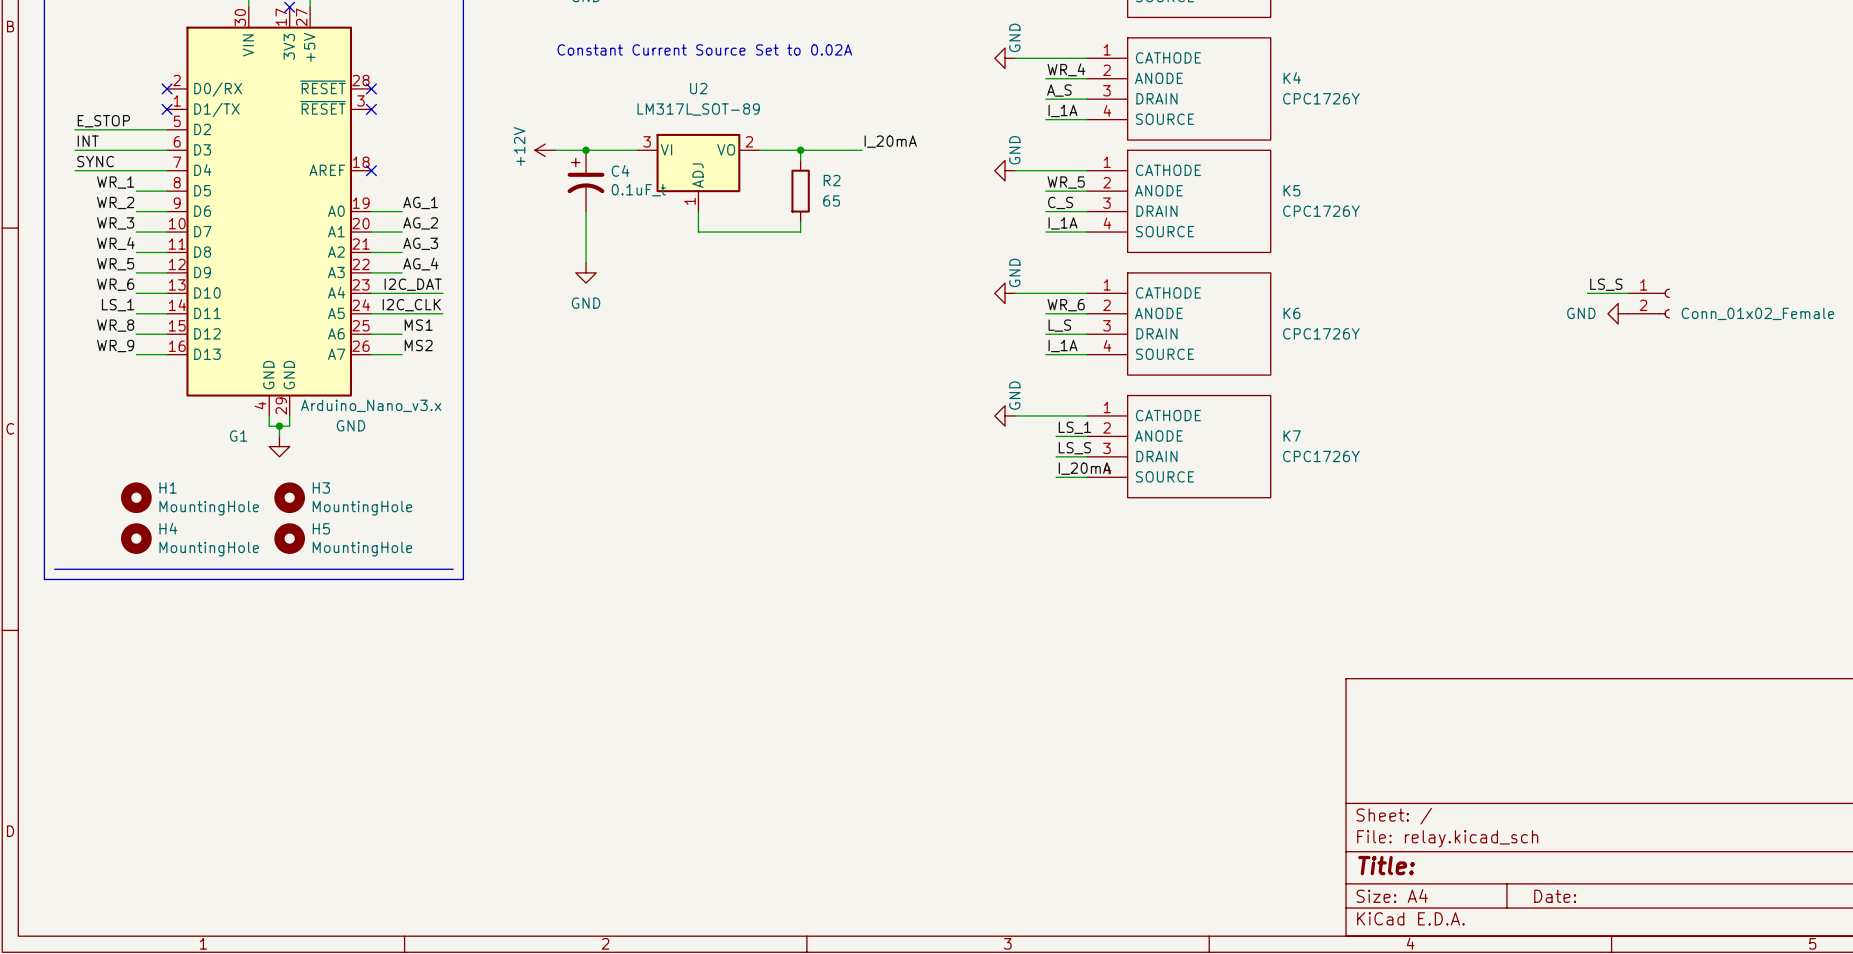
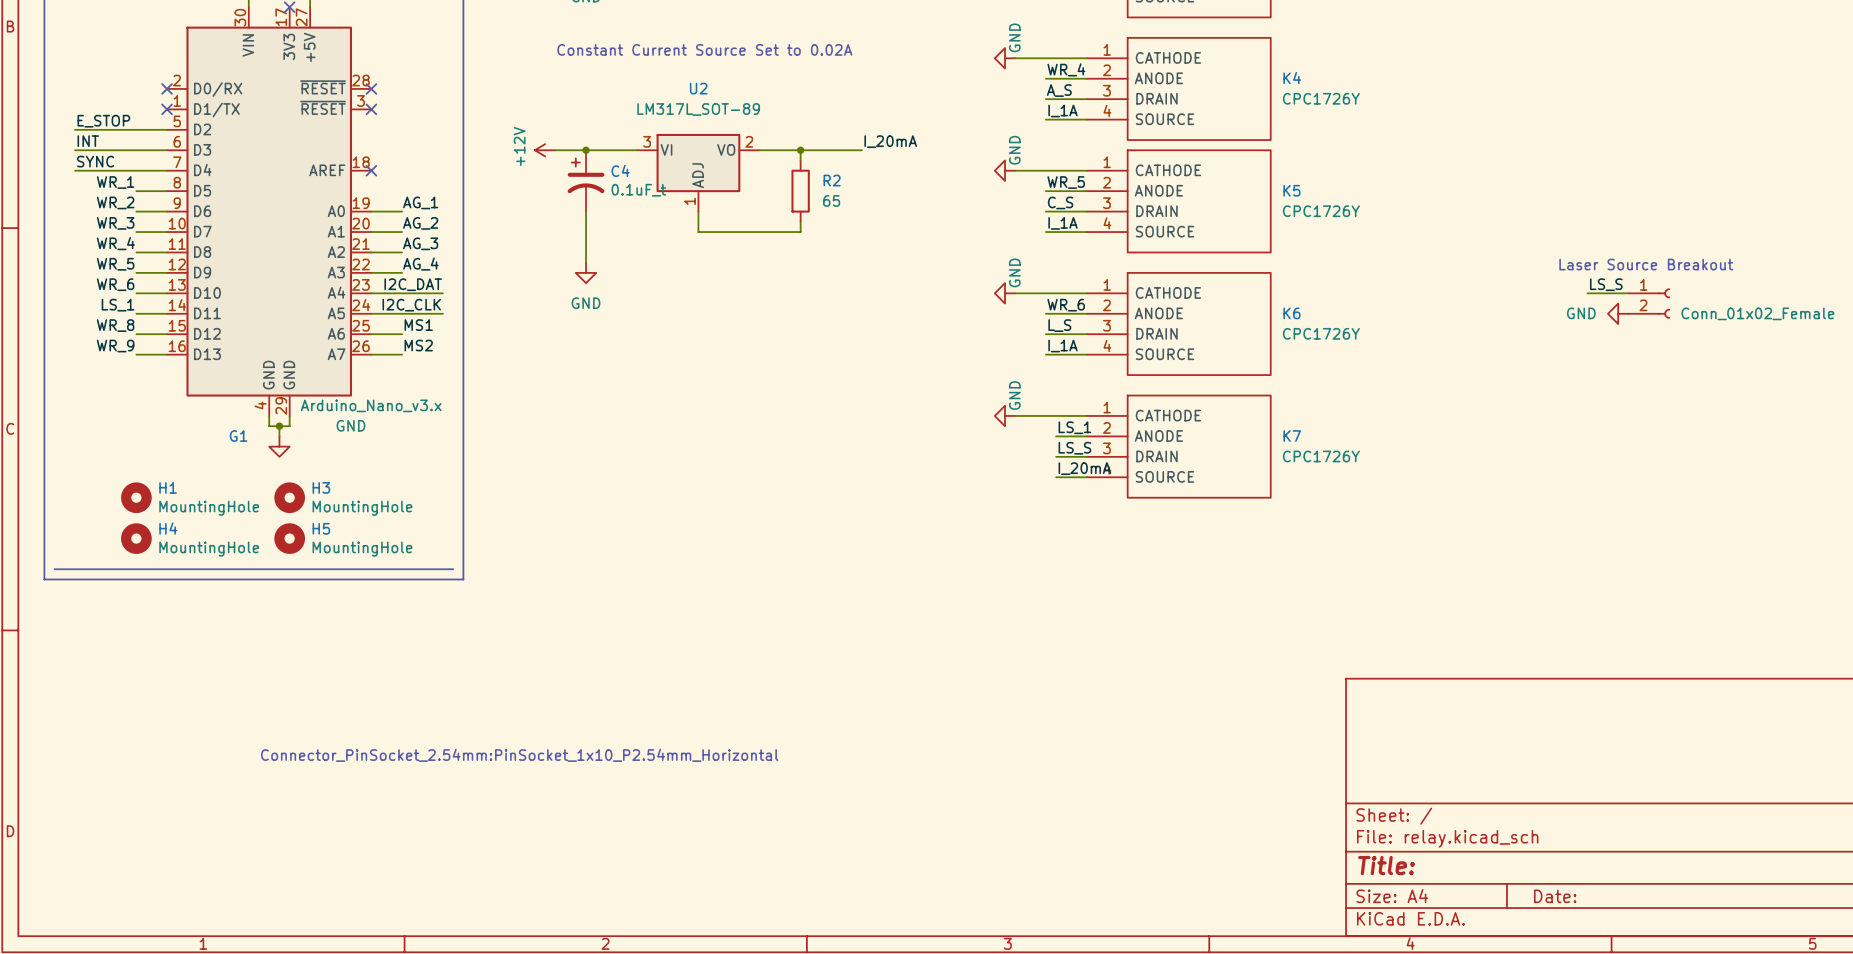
text: none -> Laser Source Breakout (1646, 264)
text: none -> Connector_PinSocket_2.54mm:PinSocket_1x10_P2.54mm_Horizontal (519, 755)

